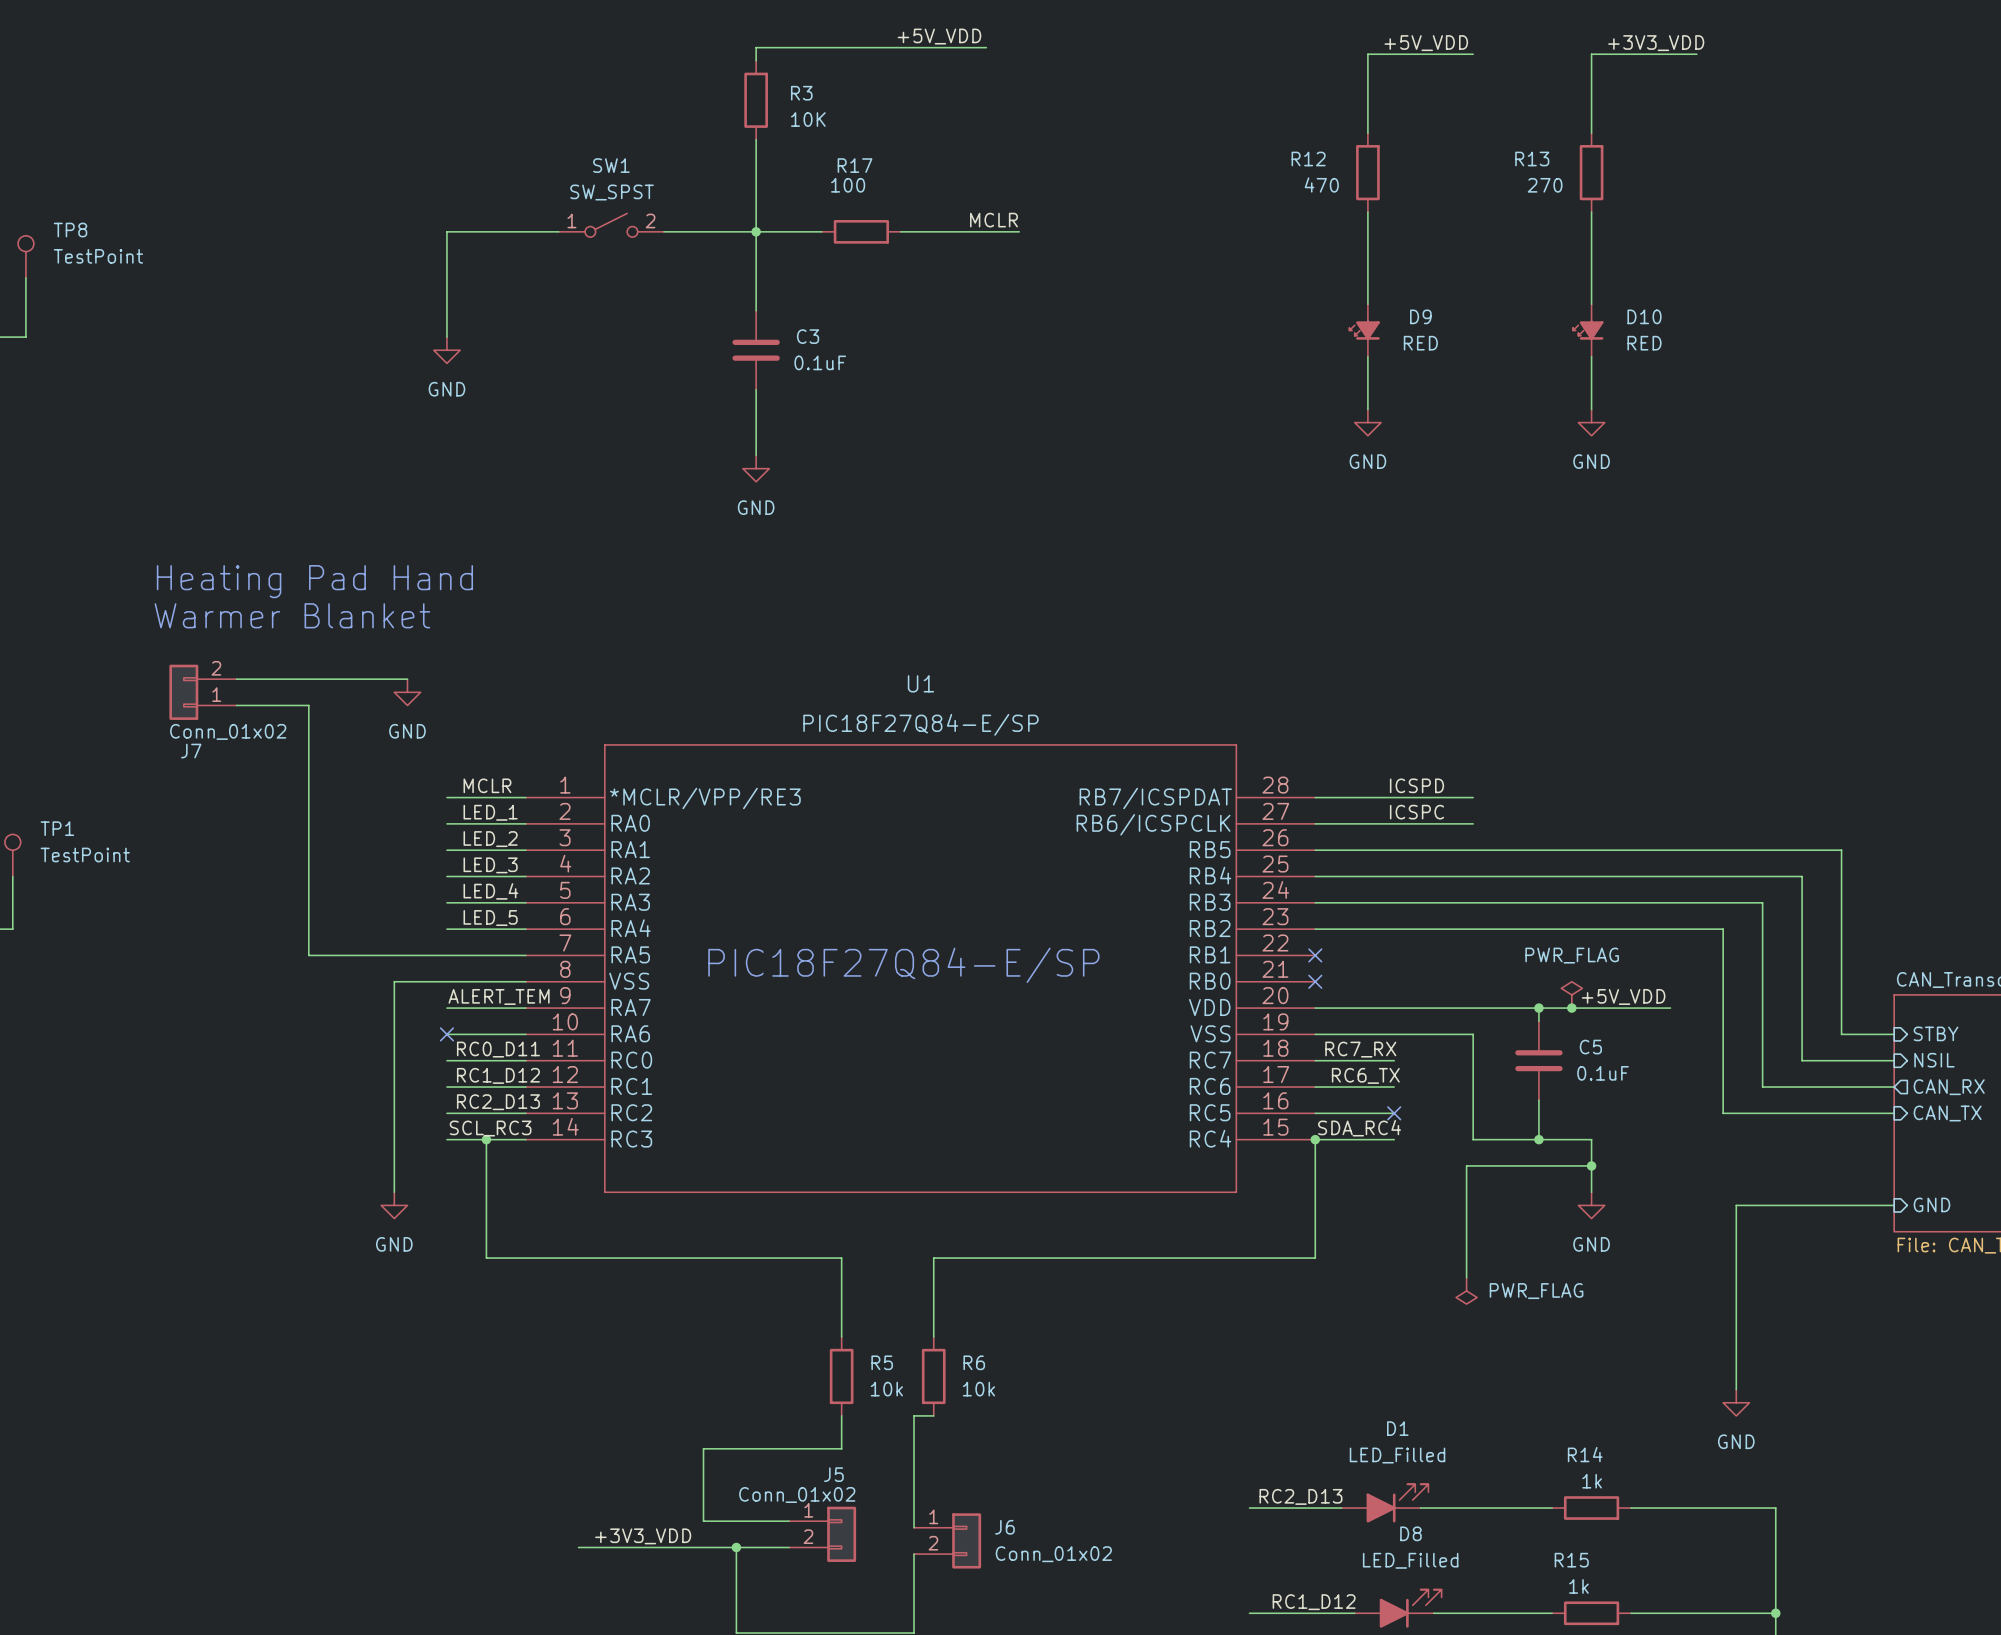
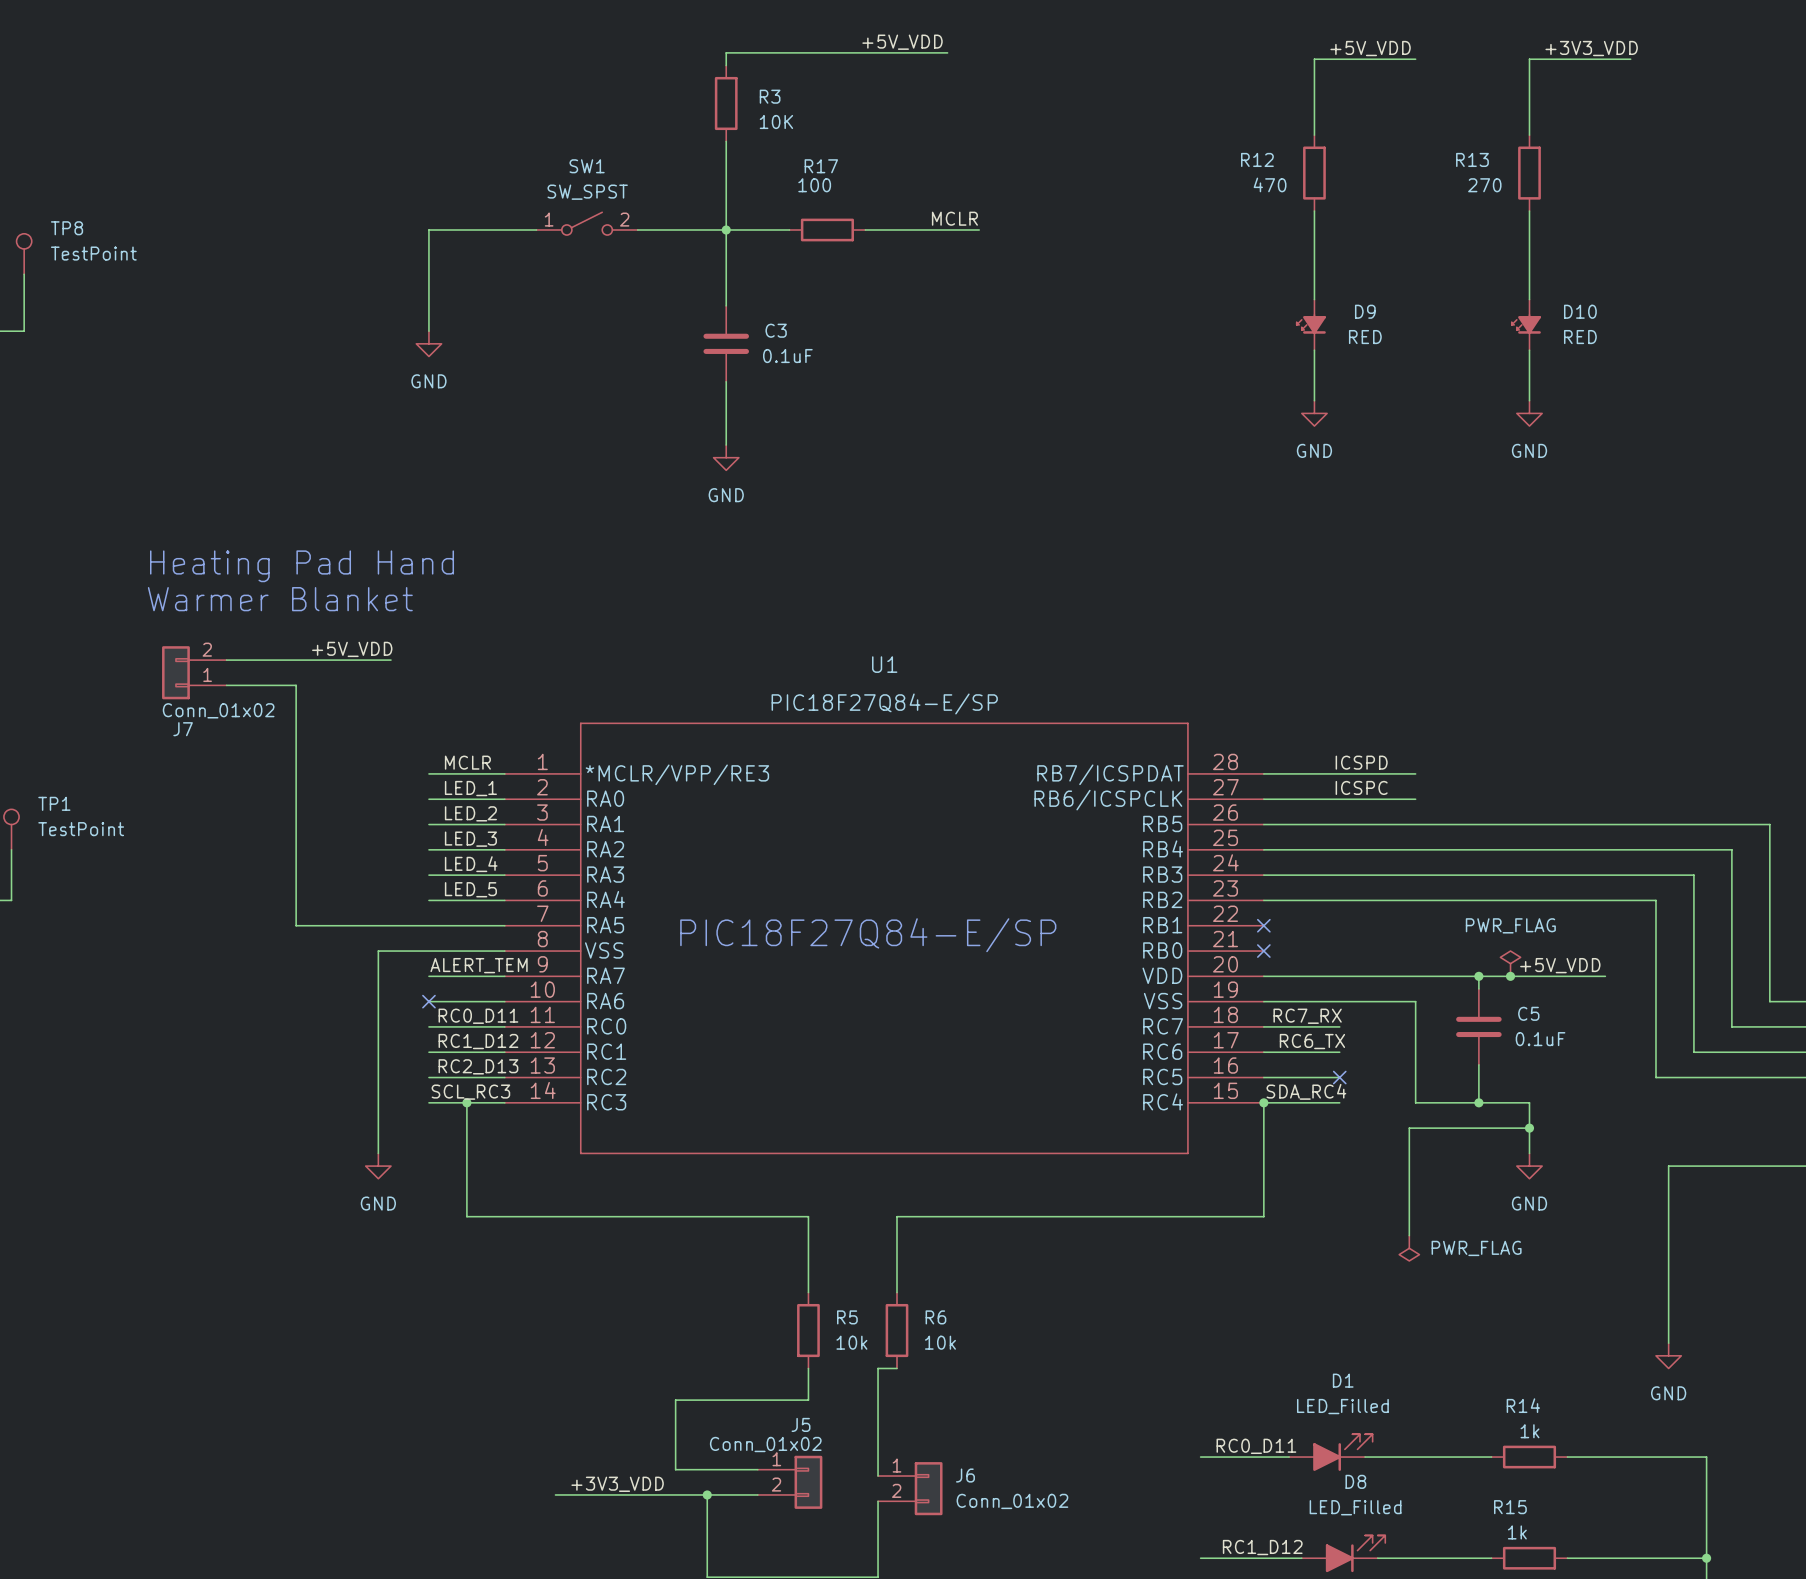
label: none -> +5V_VDD (352, 649)
power symbol: GND (407, 692) -> none
label: RC2_D13 (1300, 1496) -> RC0_D11 (1256, 1446)

